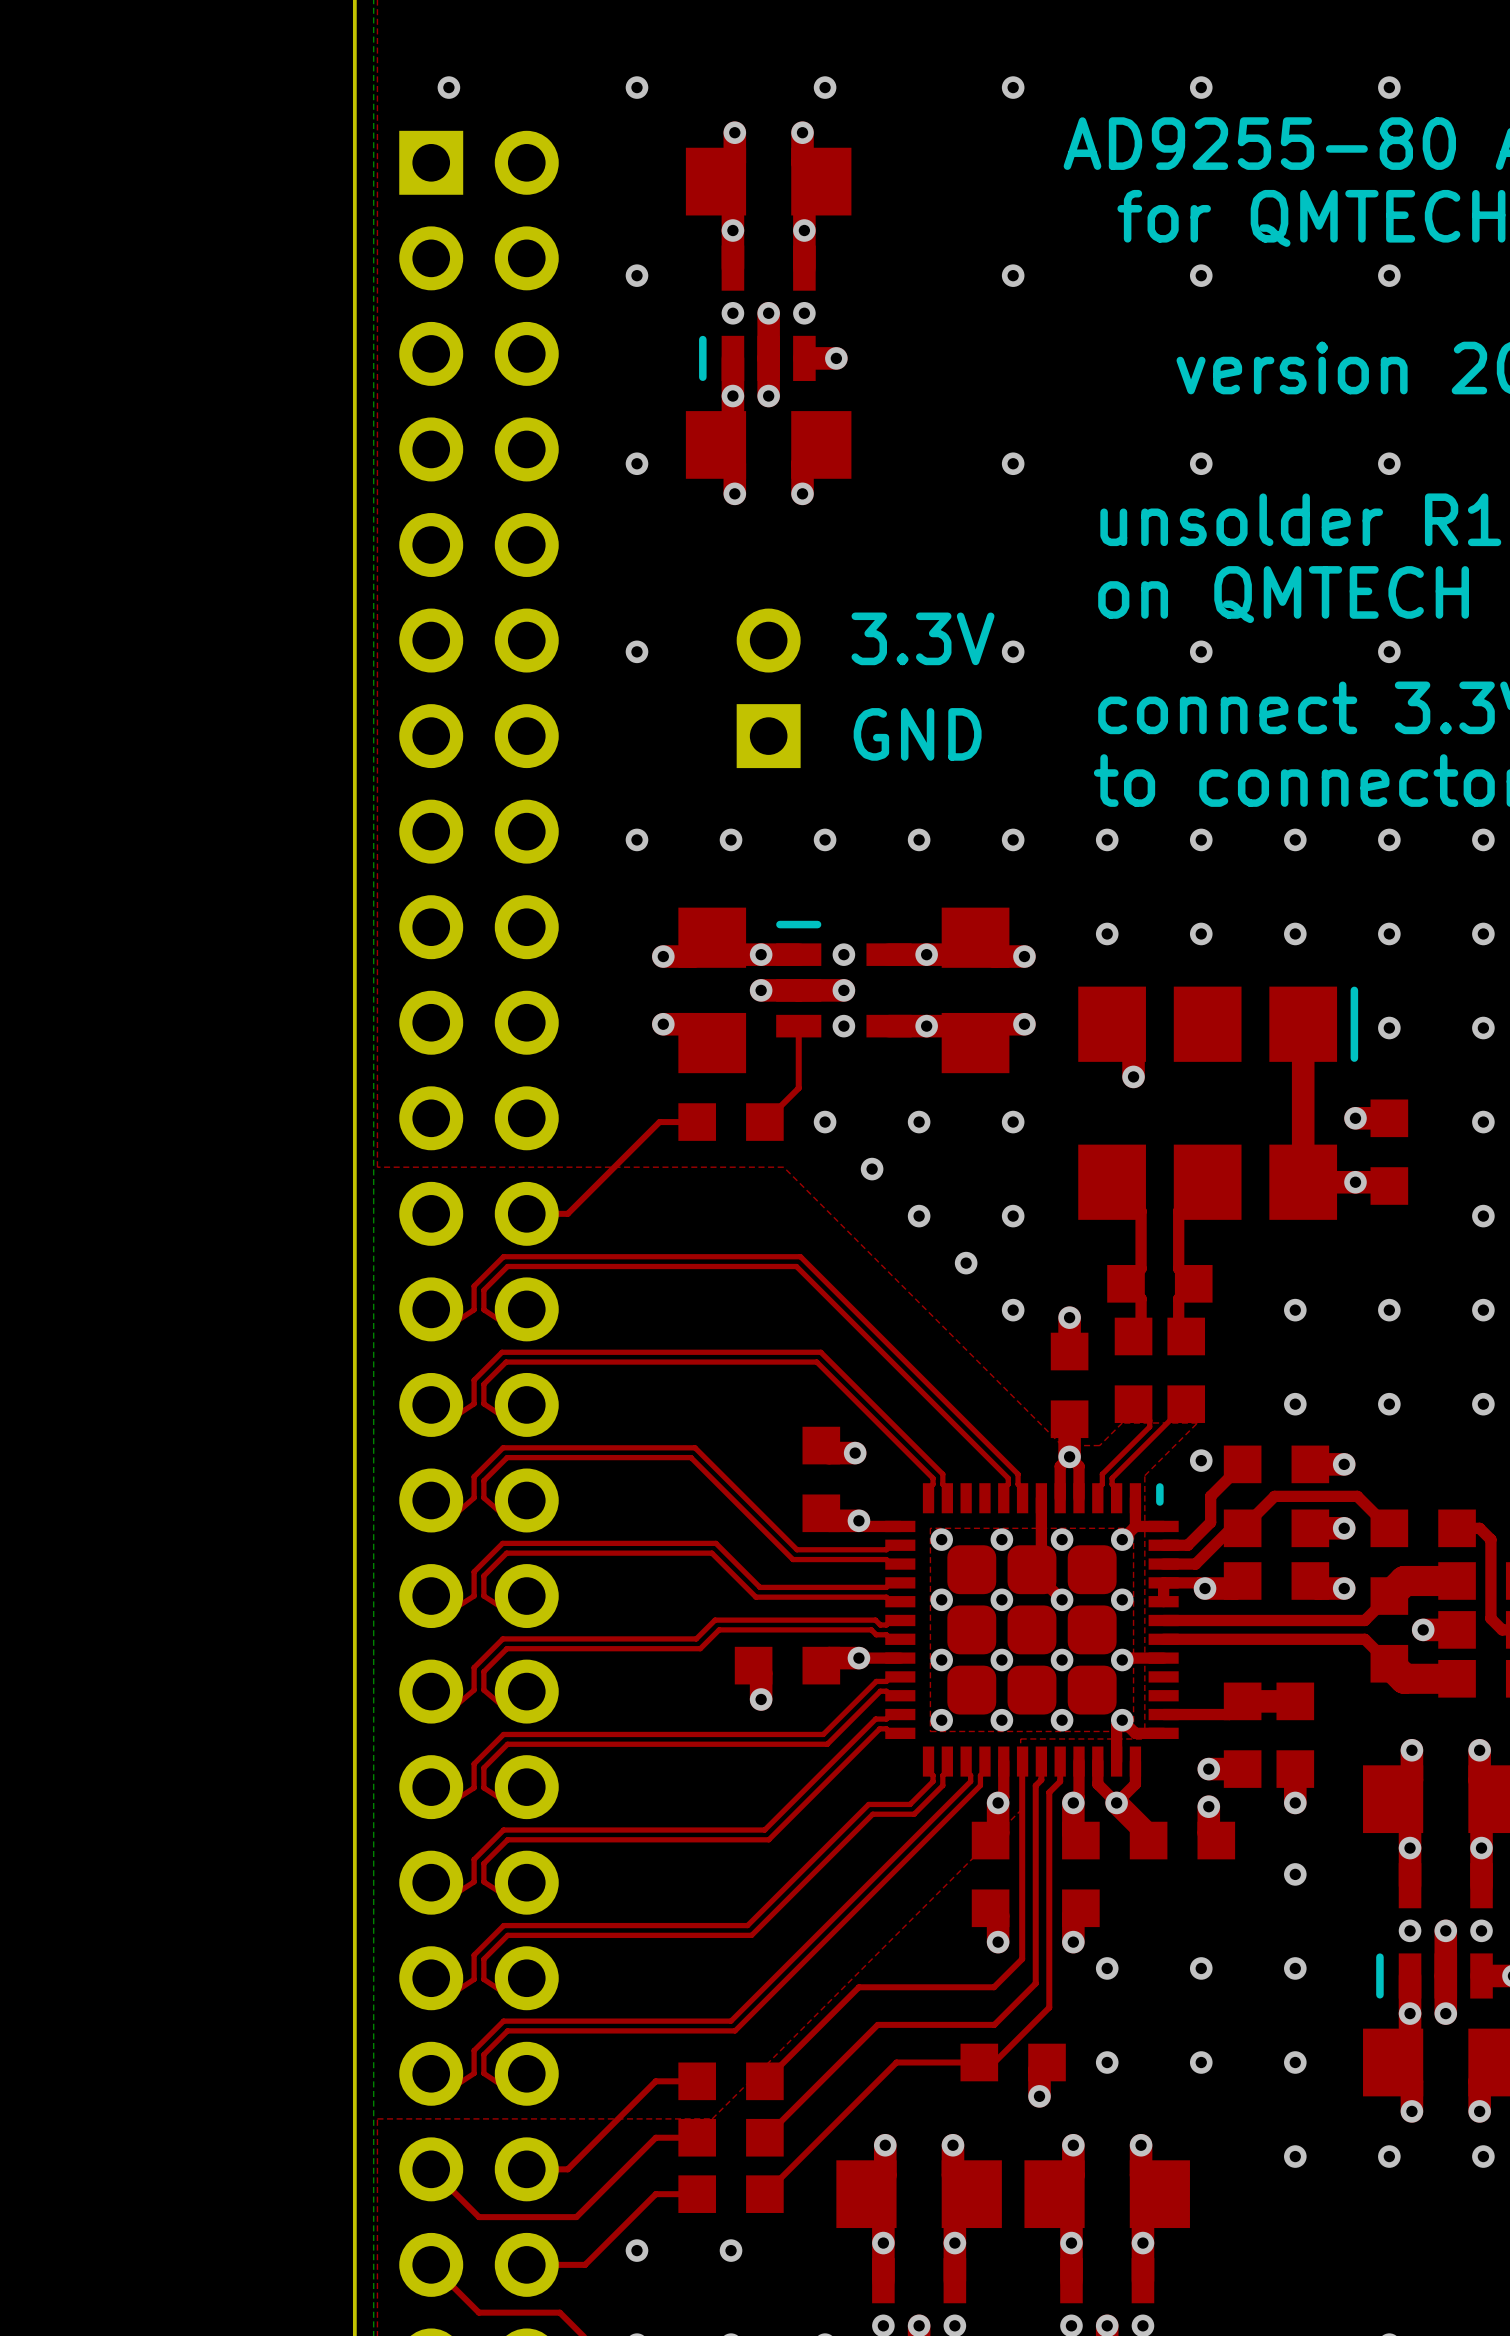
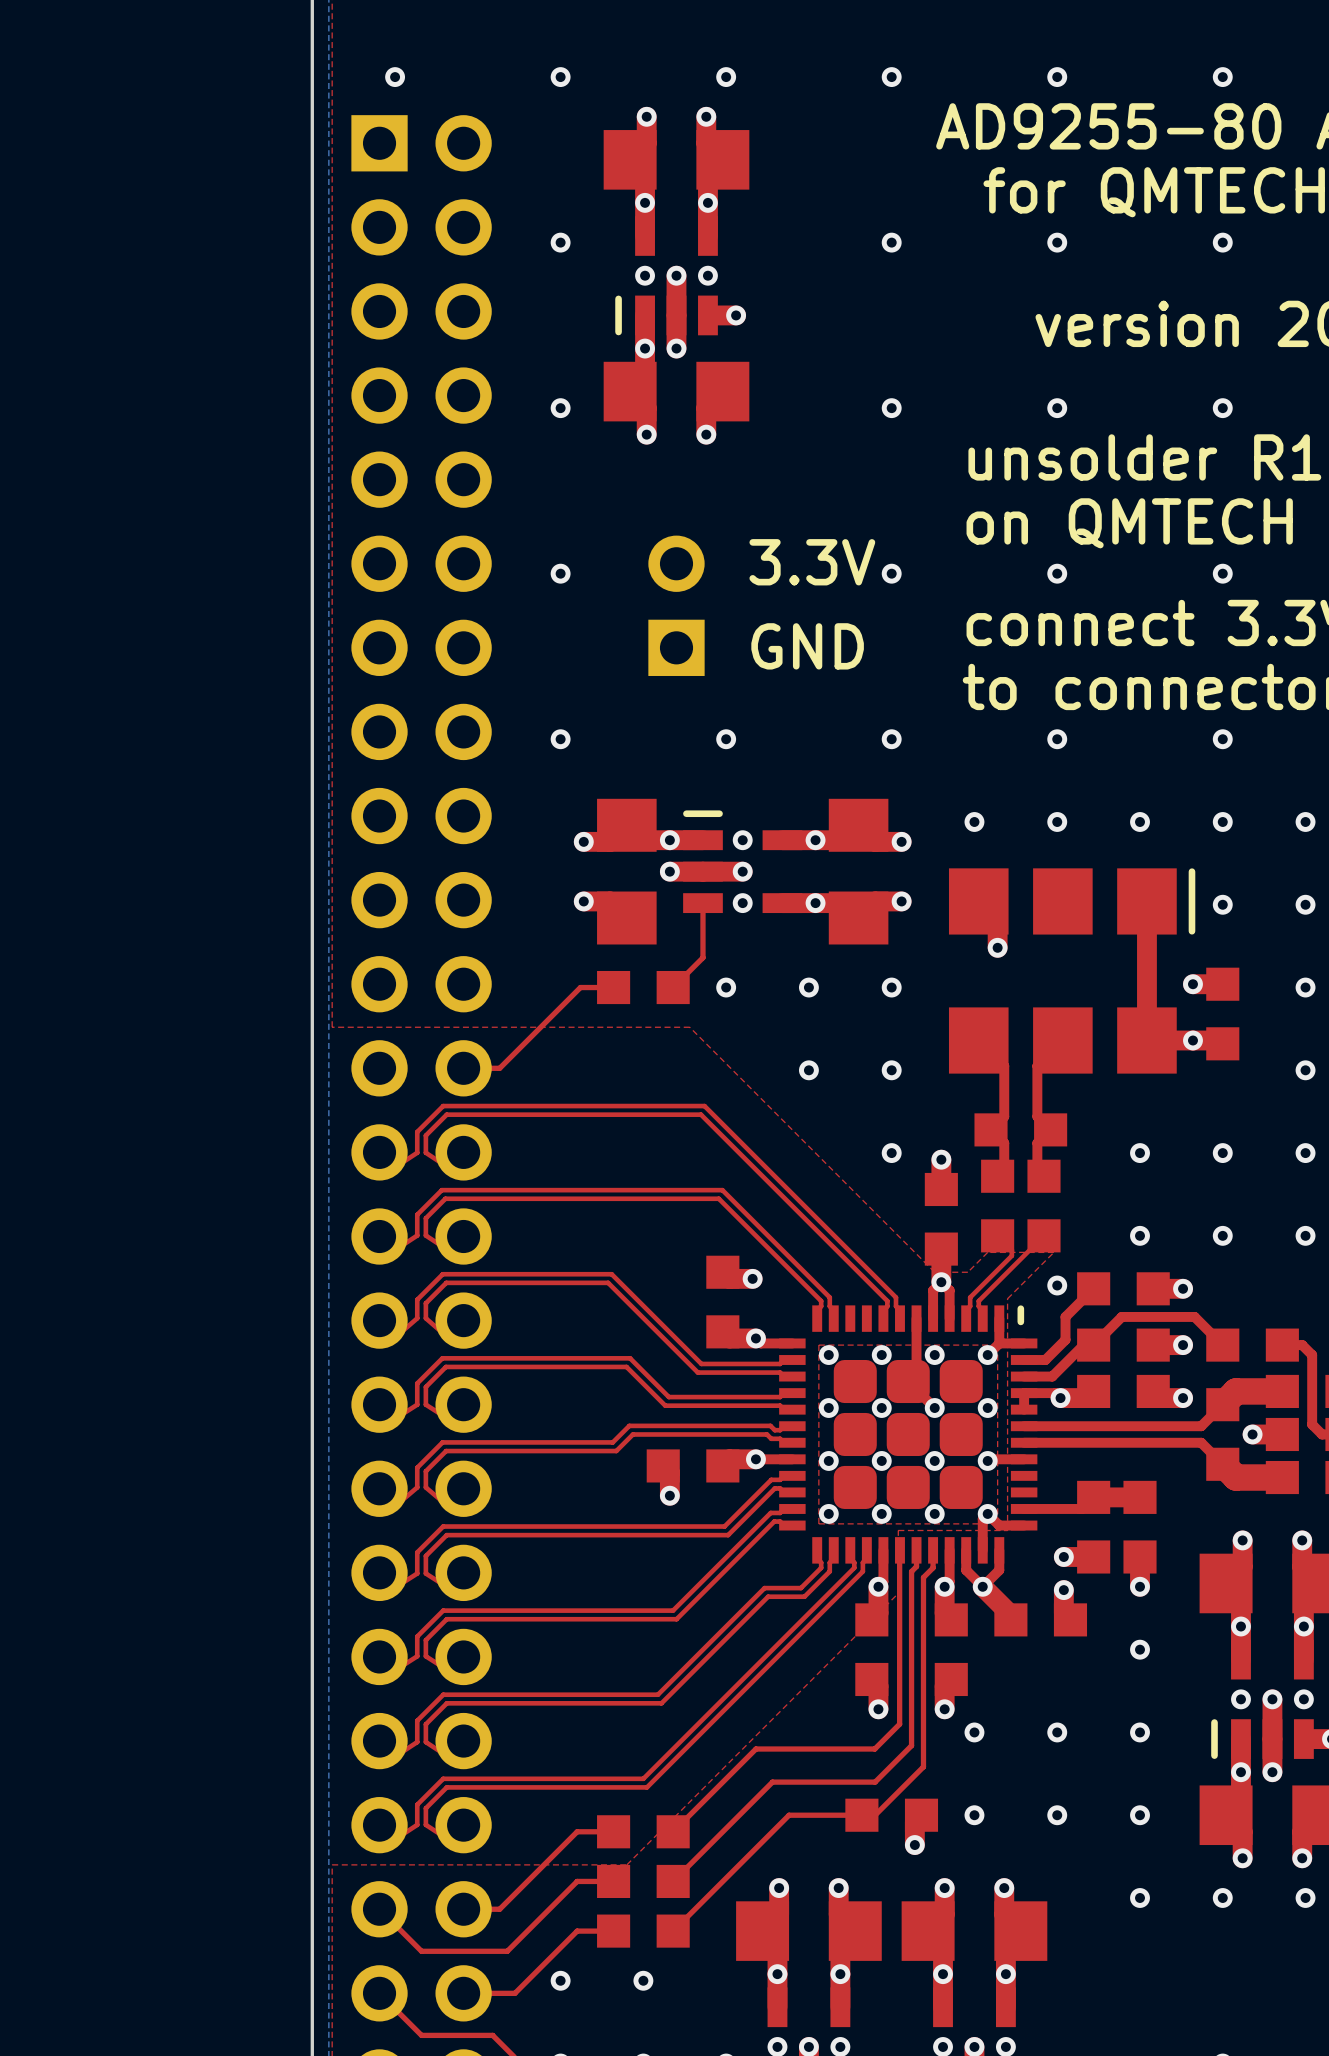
via: (731, 839) -> none
via: (919, 839) -> none
via: (1107, 839) -> none
via: (1295, 839) -> none
via: (1483, 839) -> none
via: (872, 1169) -> none
via: (966, 1263) -> none

